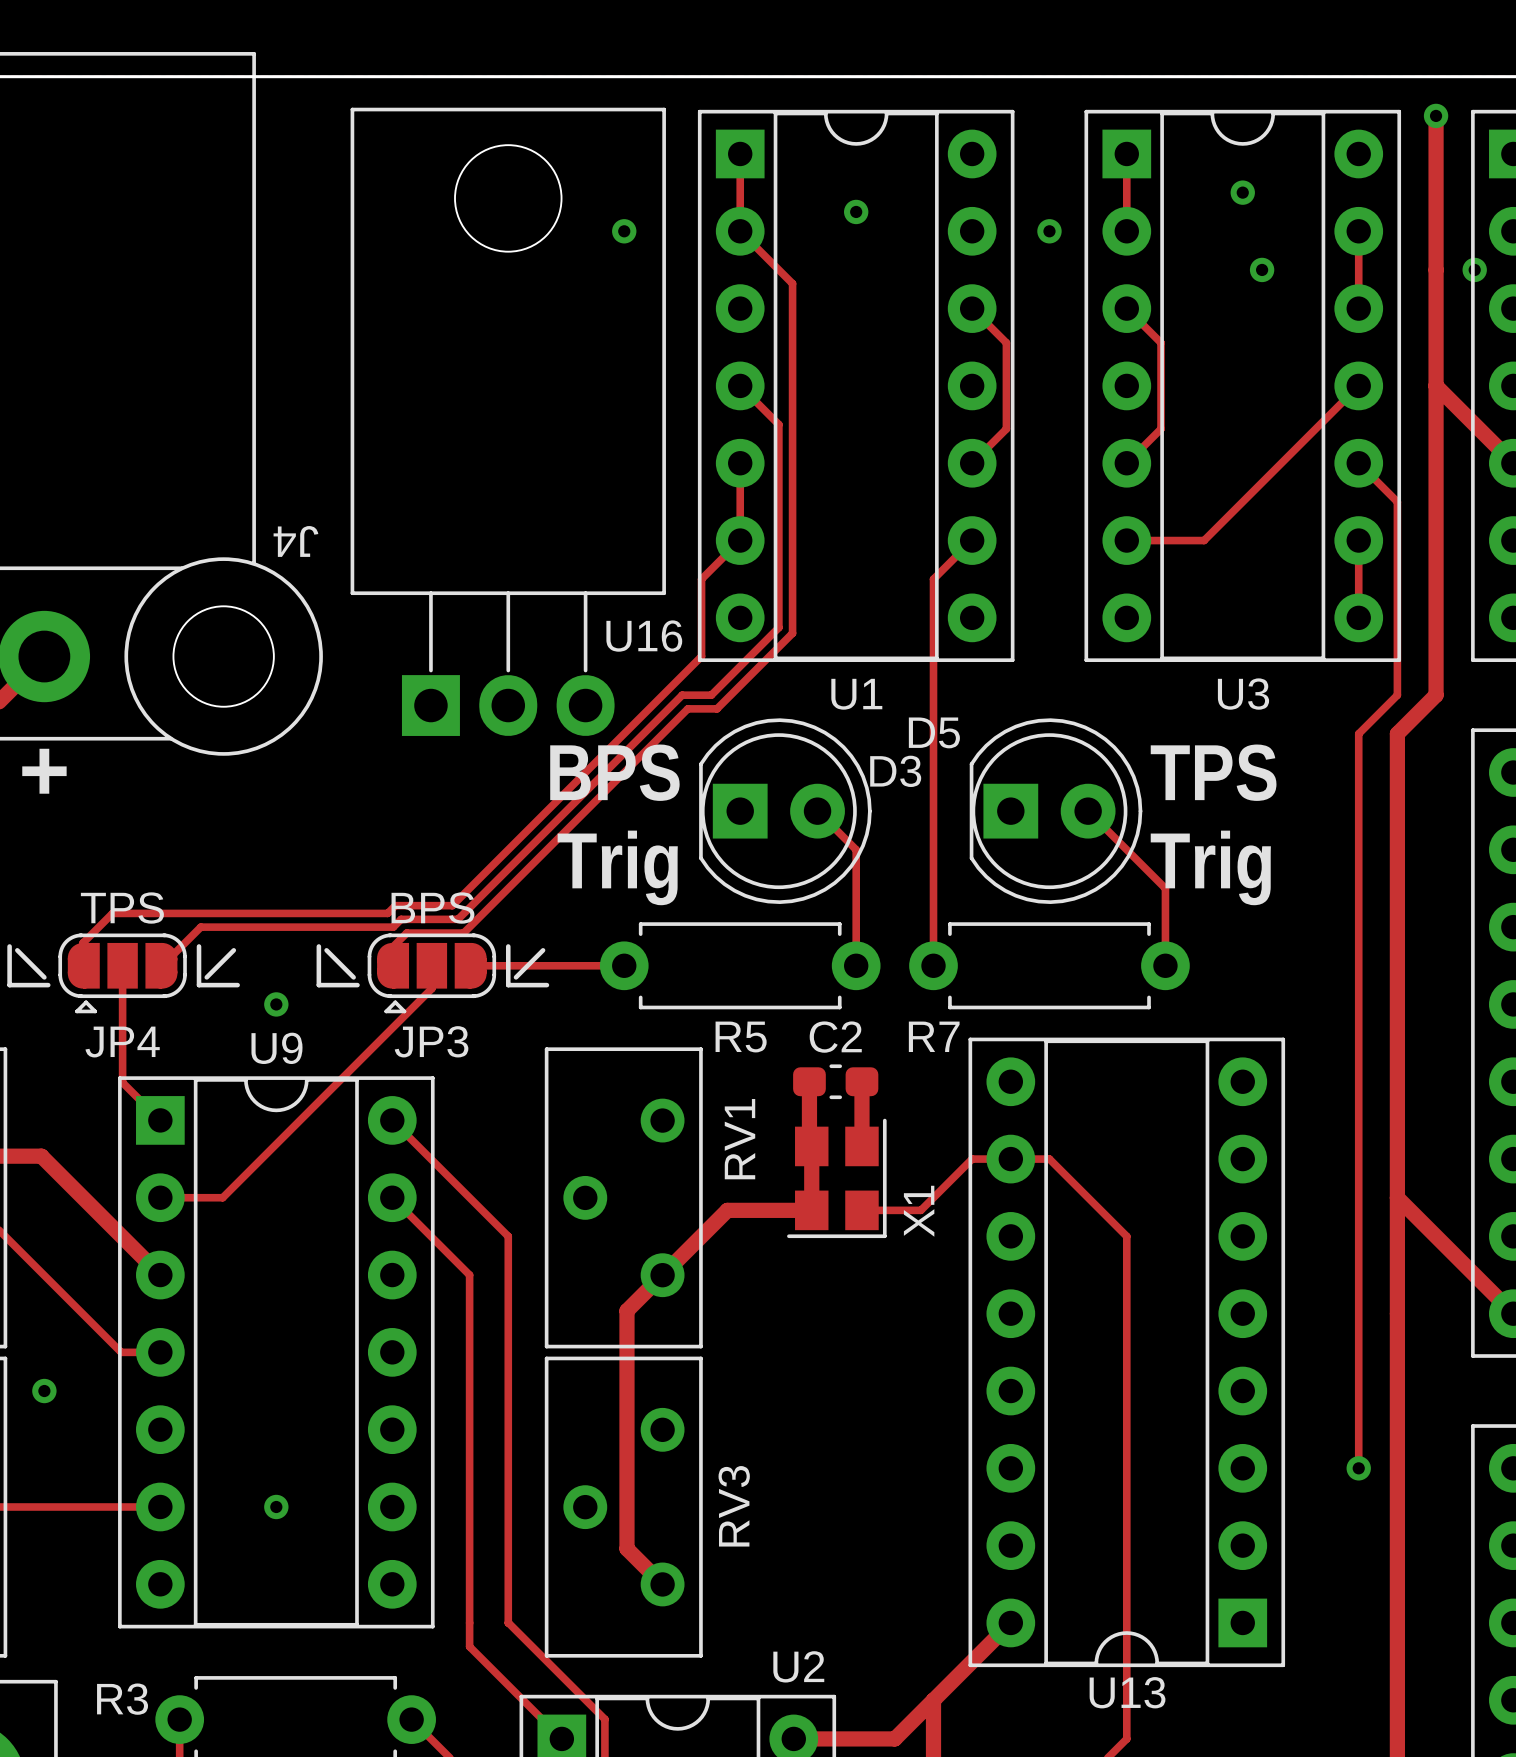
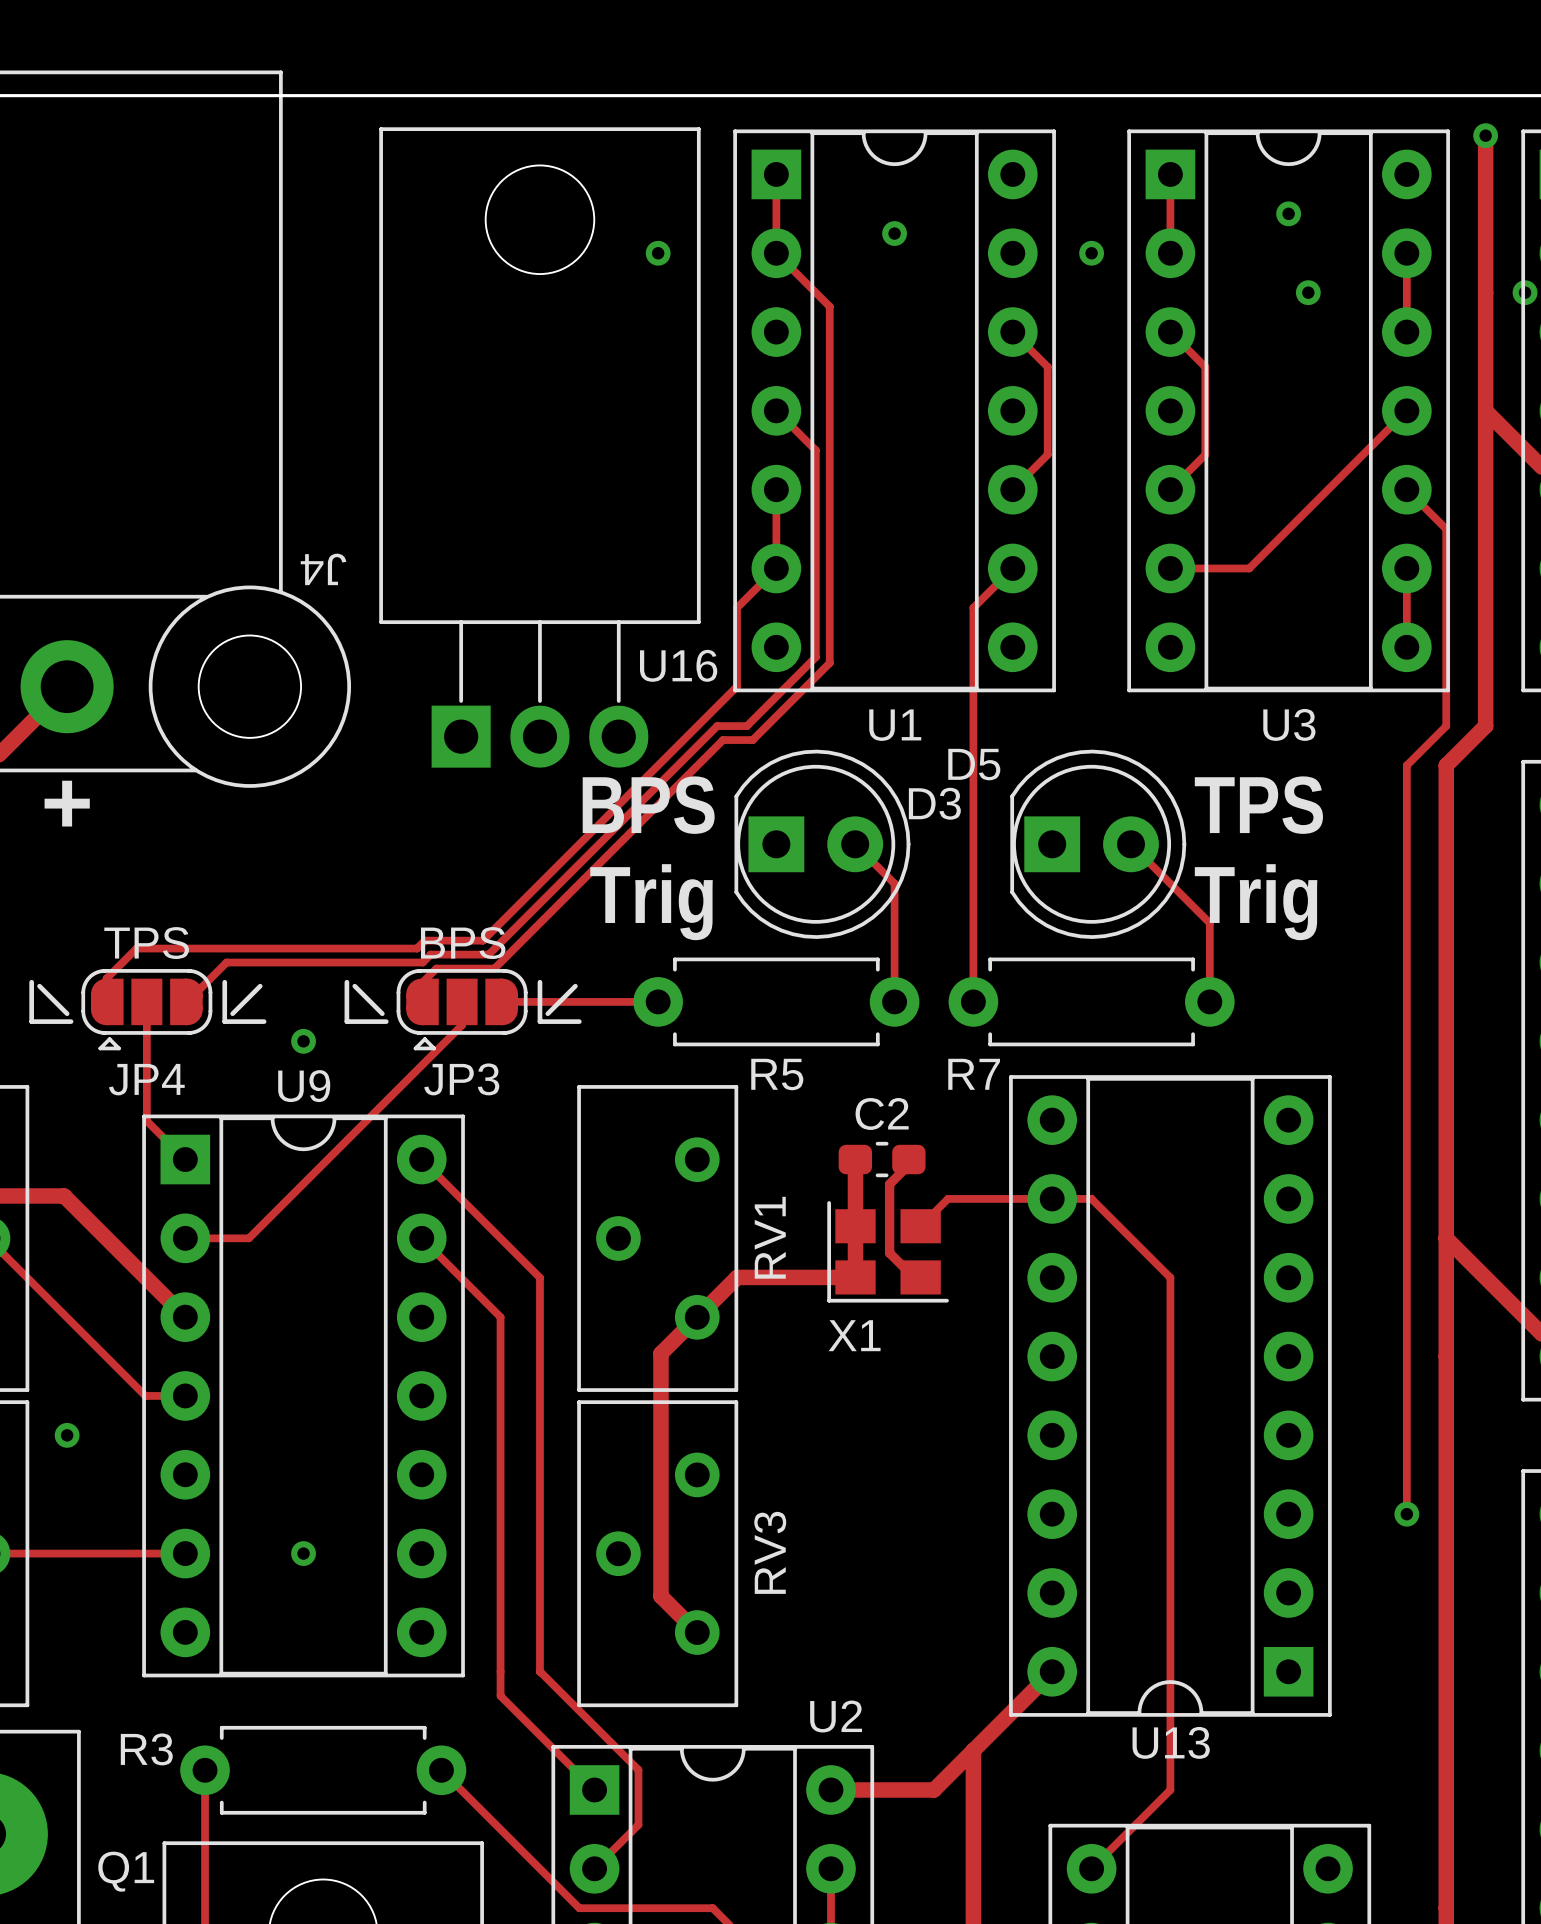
track: (809, 1081) (811, 1210) (727, 1210) (701, 1236) -> (855, 1159) (855, 1277) (737, 1277)
C2 position: (835, 1081) -> (882, 1159)
track: (861, 1081) (861, 1146) -> none
track: none -> (908, 1159) (908, 1164) (889, 1184) (889, 1253) (913, 1277) (920, 1277)
RV1 name position: RV1 (739, 1139) -> RV1 (770, 1237)
track: (972, 1159) (920, 1210) (861, 1210) -> (1012, 1198) (947, 1198) (920, 1226)
X1 rotation: 0° (836, 1178) -> 90° clockwise (888, 1251)

